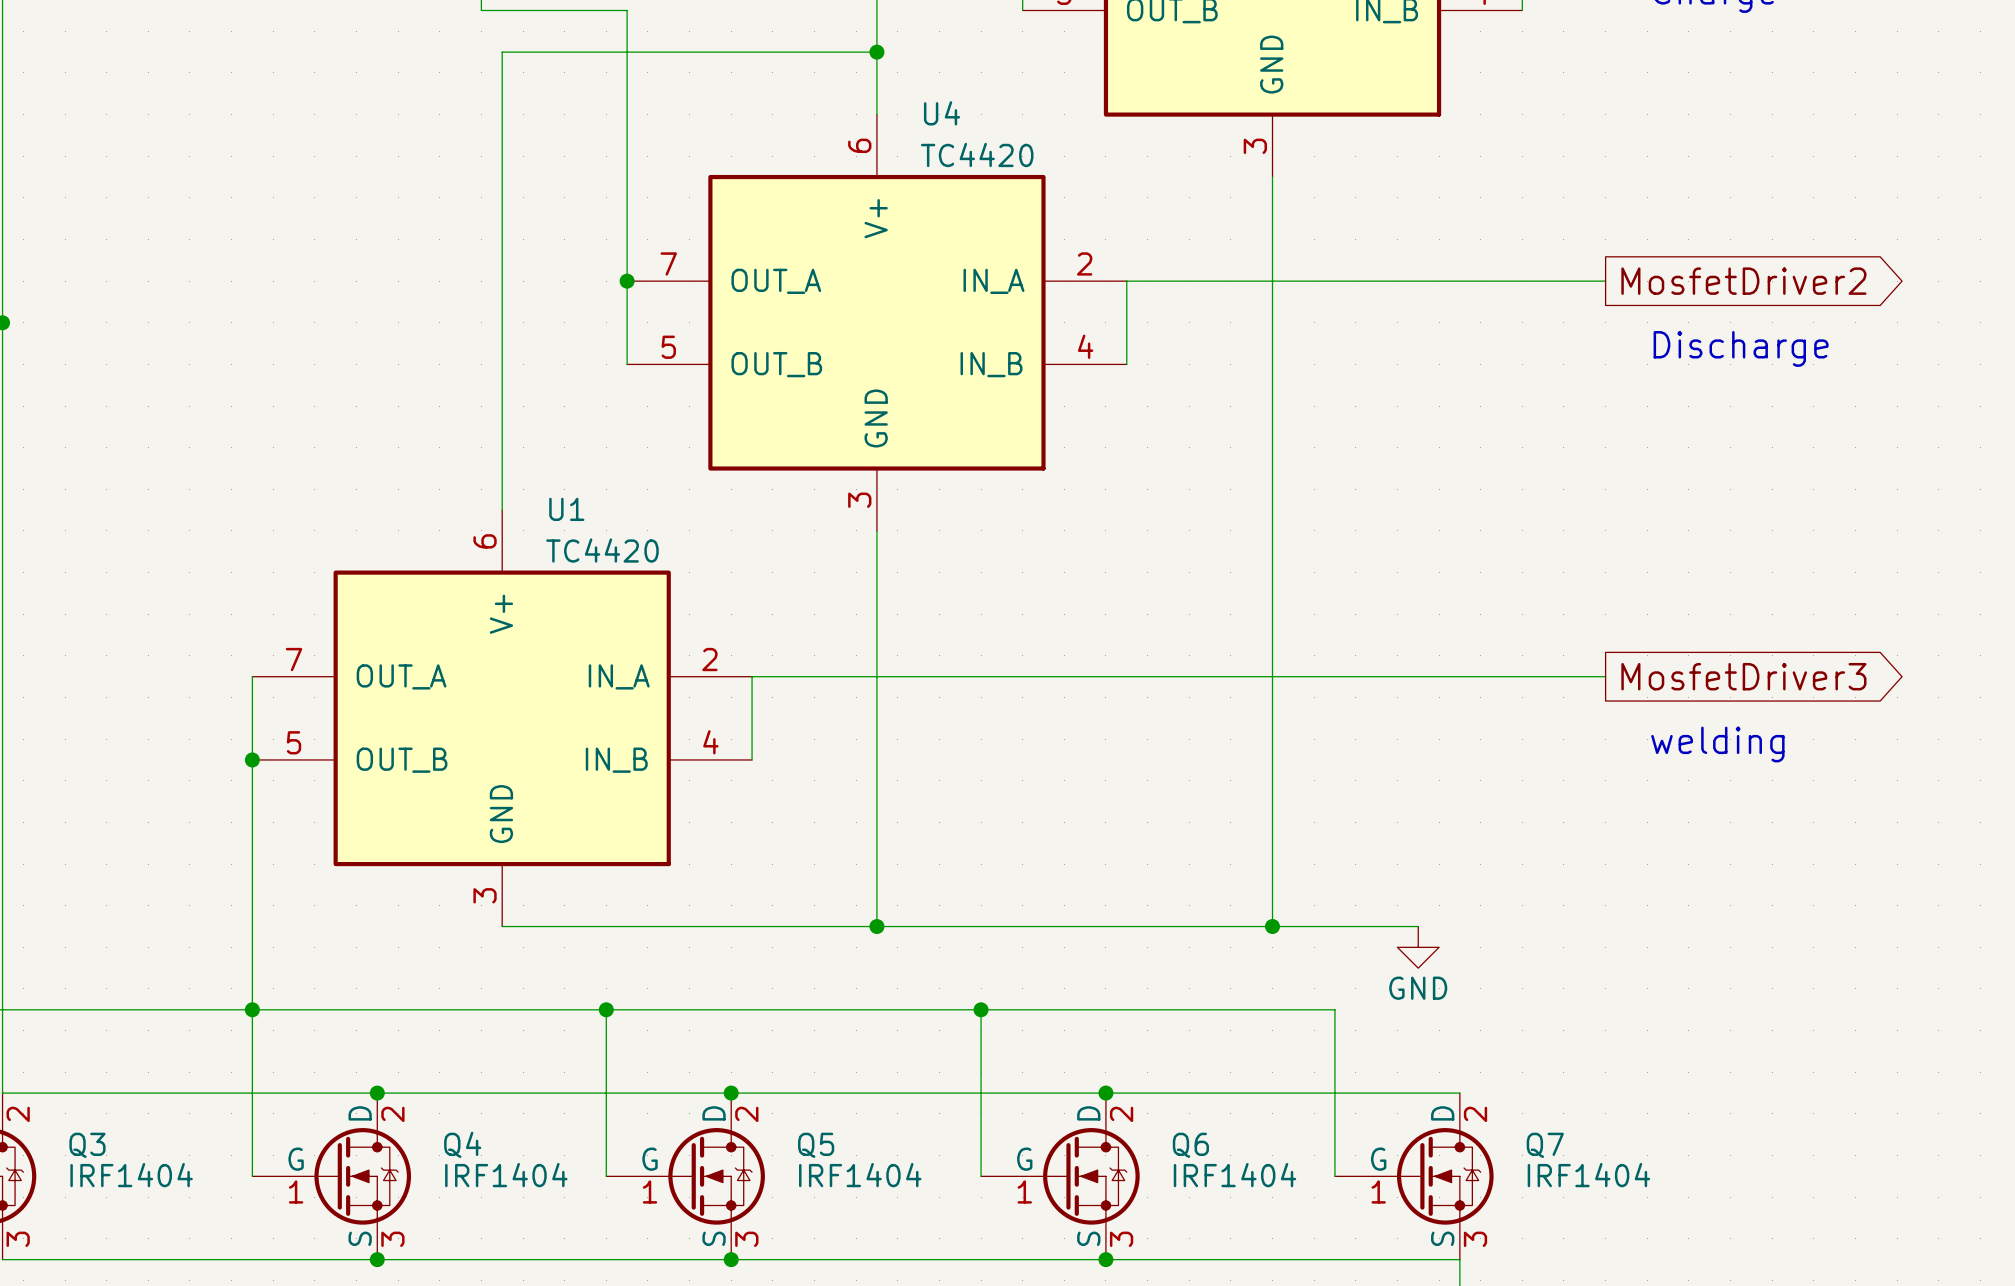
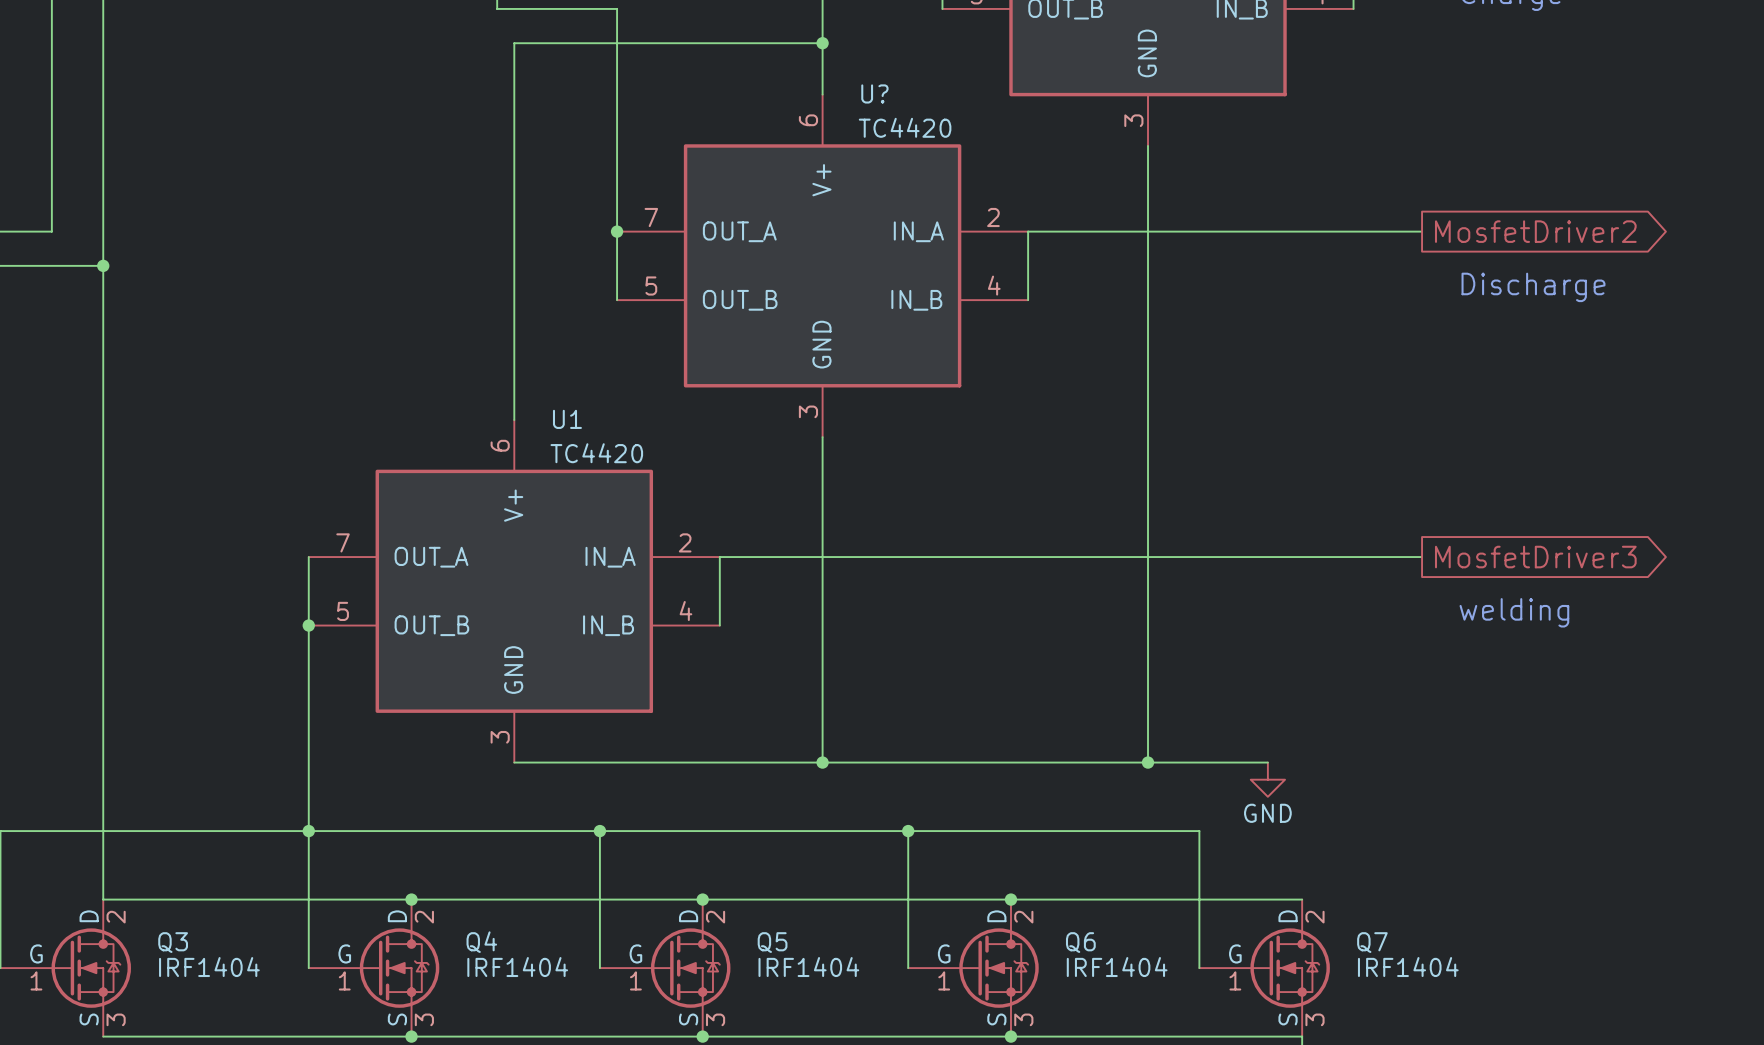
U4 name: U4 (942, 113) -> U? (874, 93)

